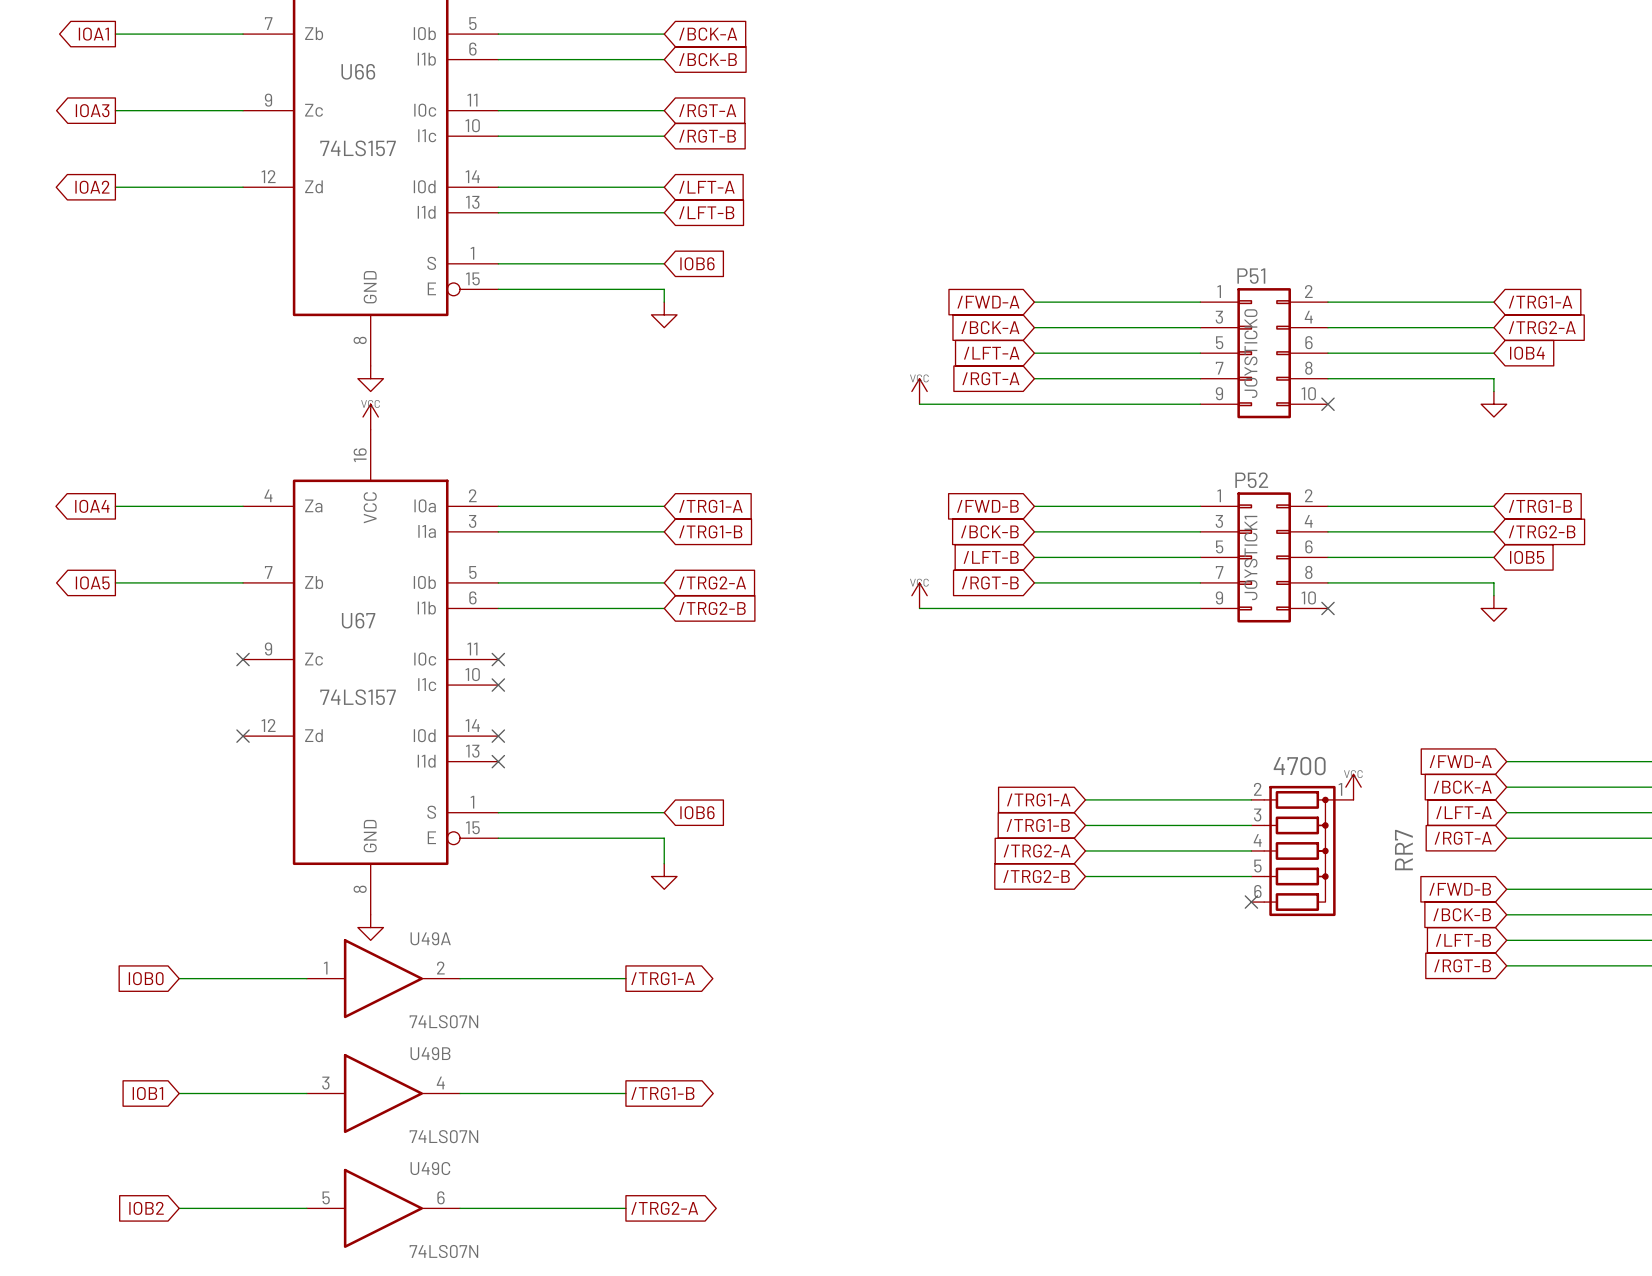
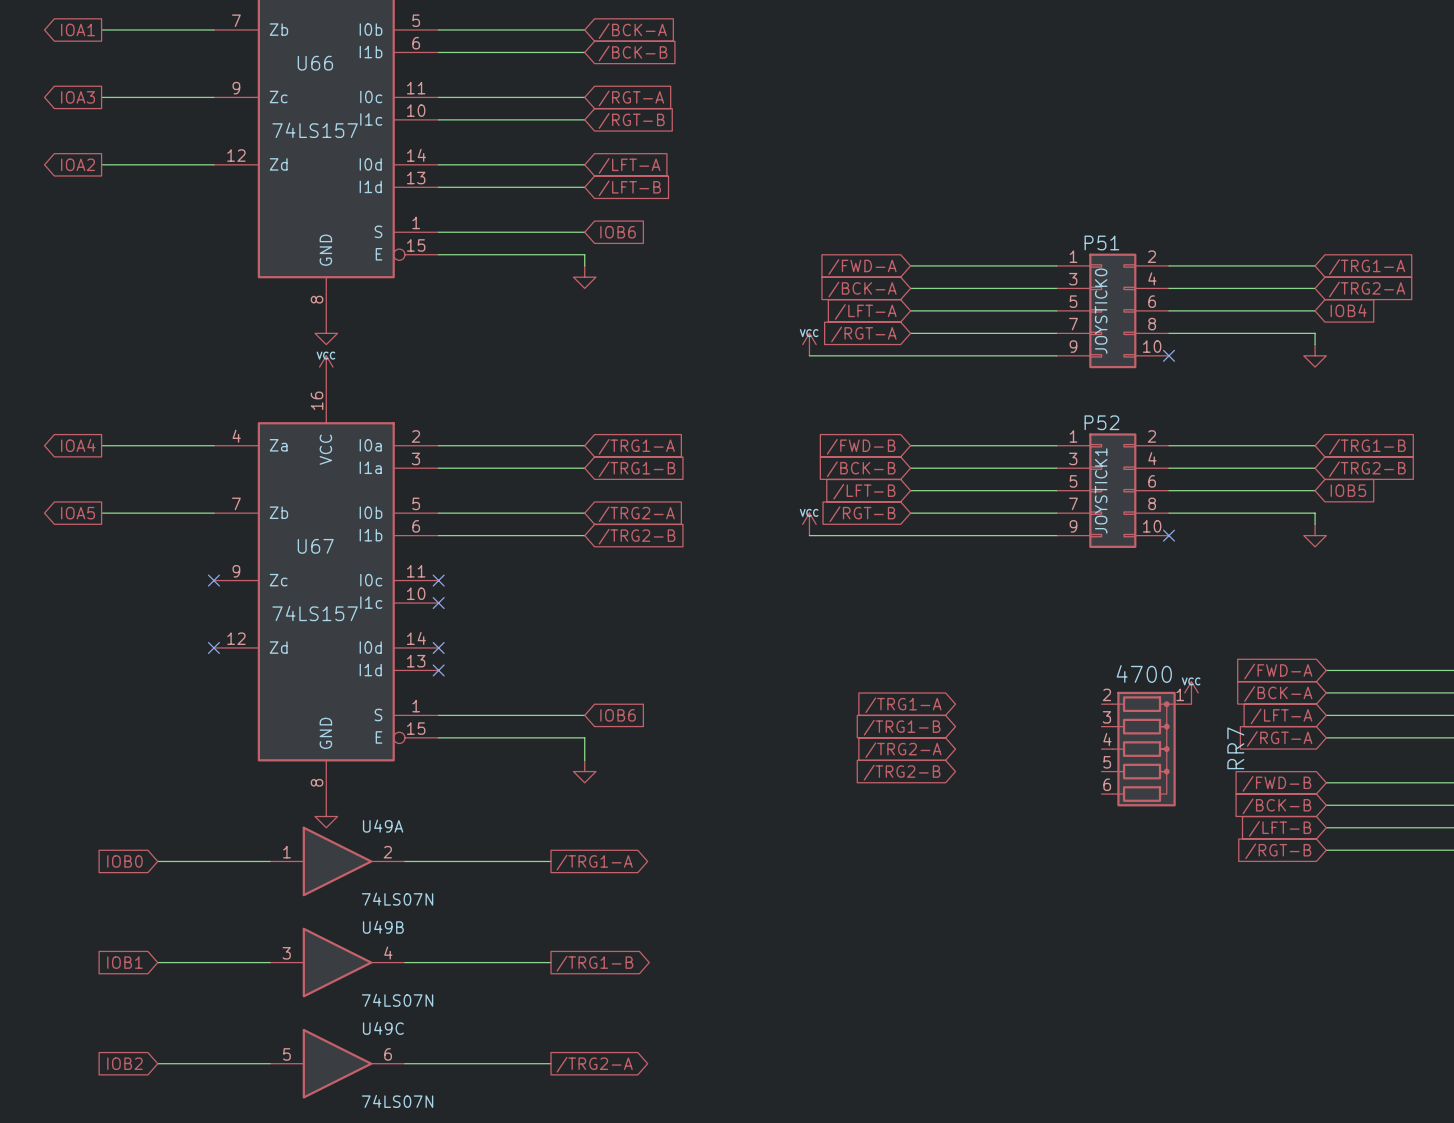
wire: (1085, 799) (1251, 799) -> none
wire: (1085, 825) (1251, 825) -> none
wire: (1085, 850) (1251, 850) -> none
wire: (1085, 876) (1251, 876) -> none
no-connect mark: (1251, 902) -> none

